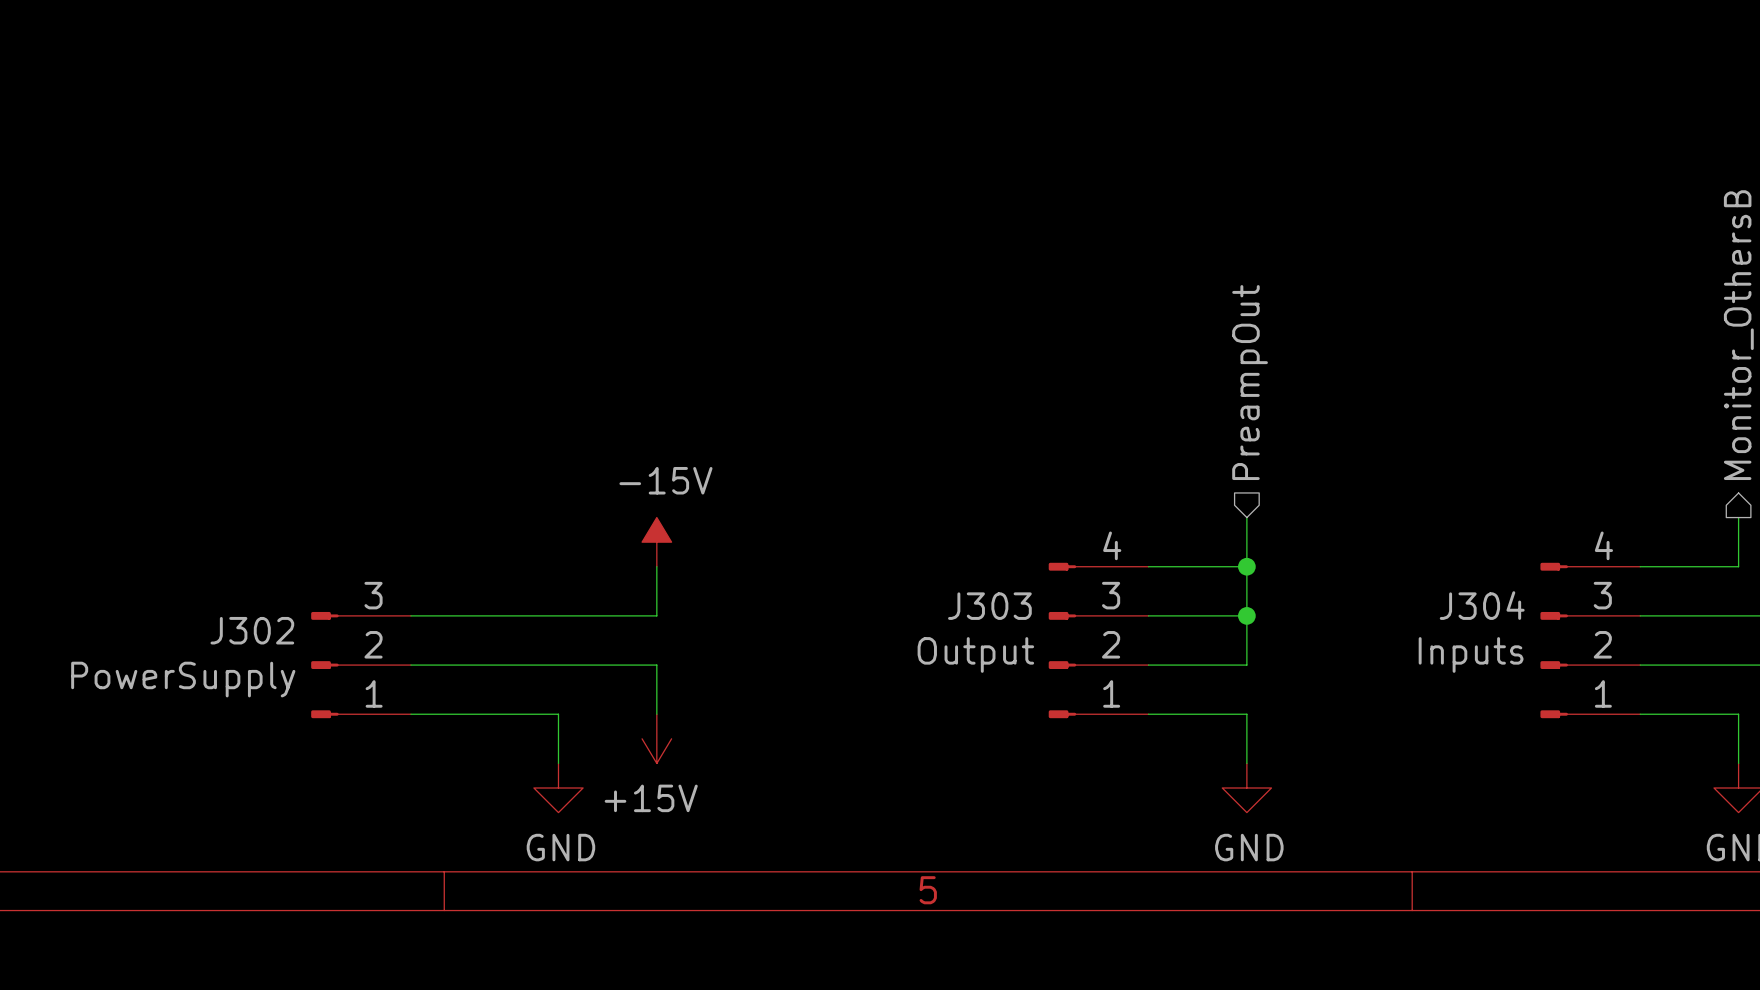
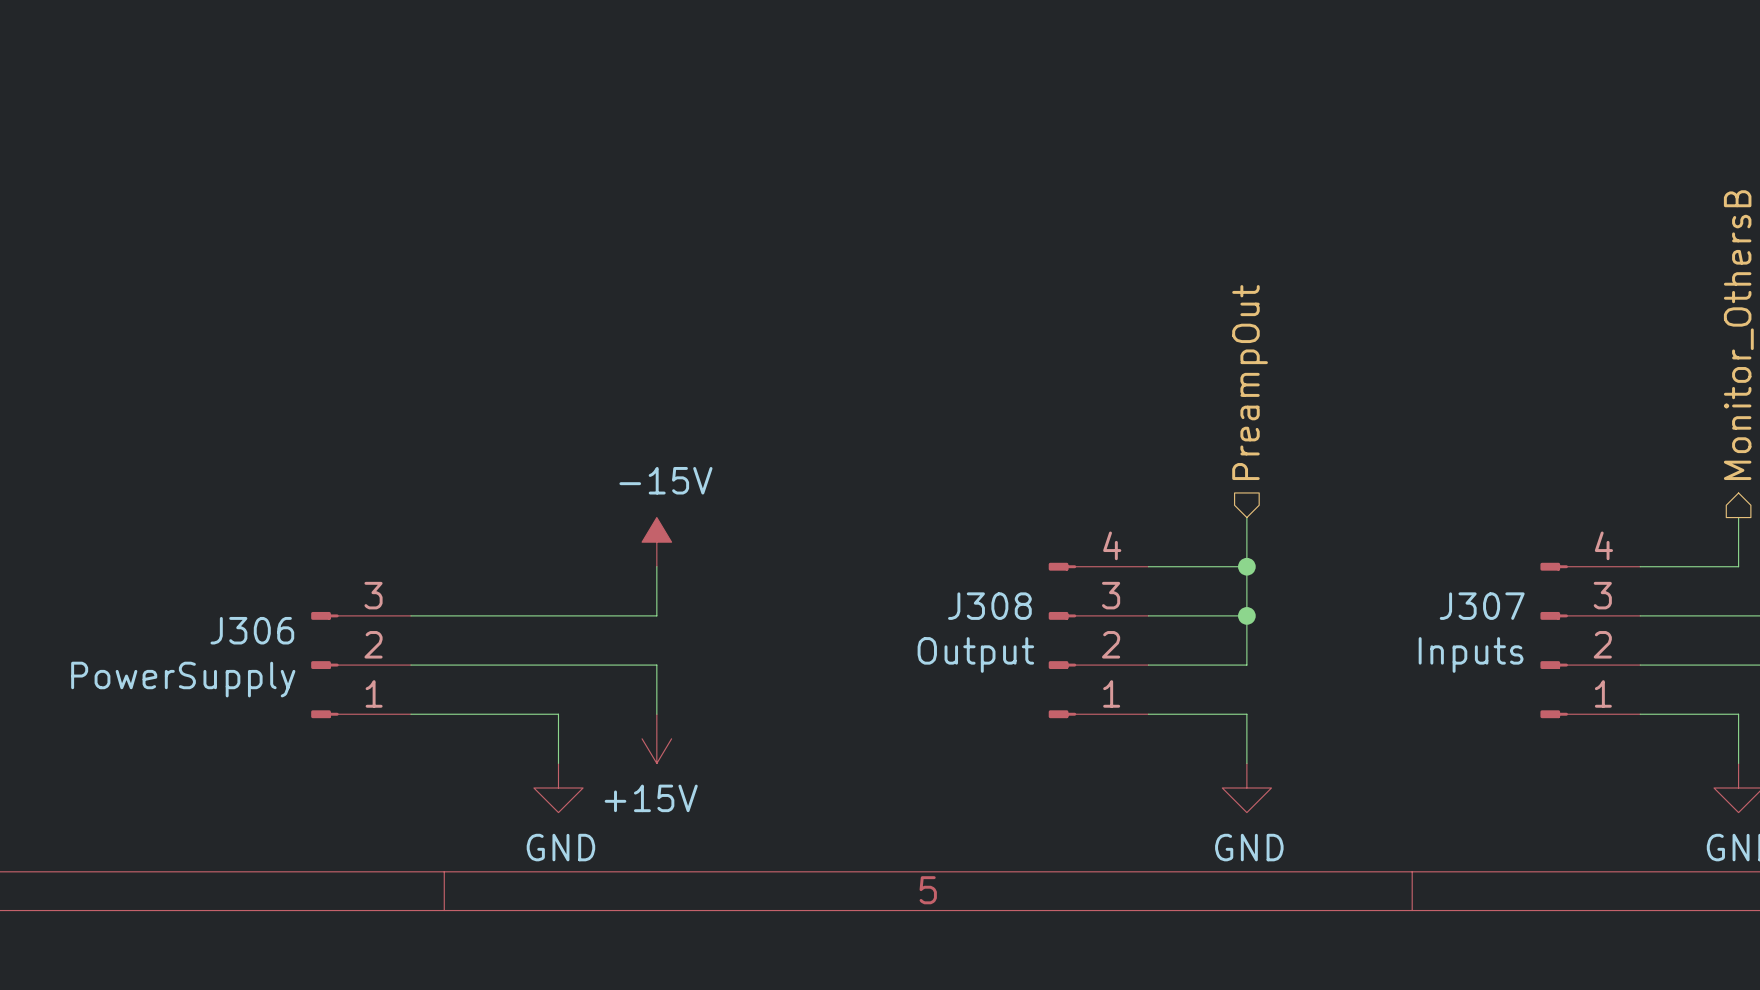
J304 name: J304 (1482, 605) -> J307 (1482, 606)
J303 name: J303 (989, 606) -> J308 (989, 606)
J302 name: J302 (252, 630) -> J306 (252, 630)

